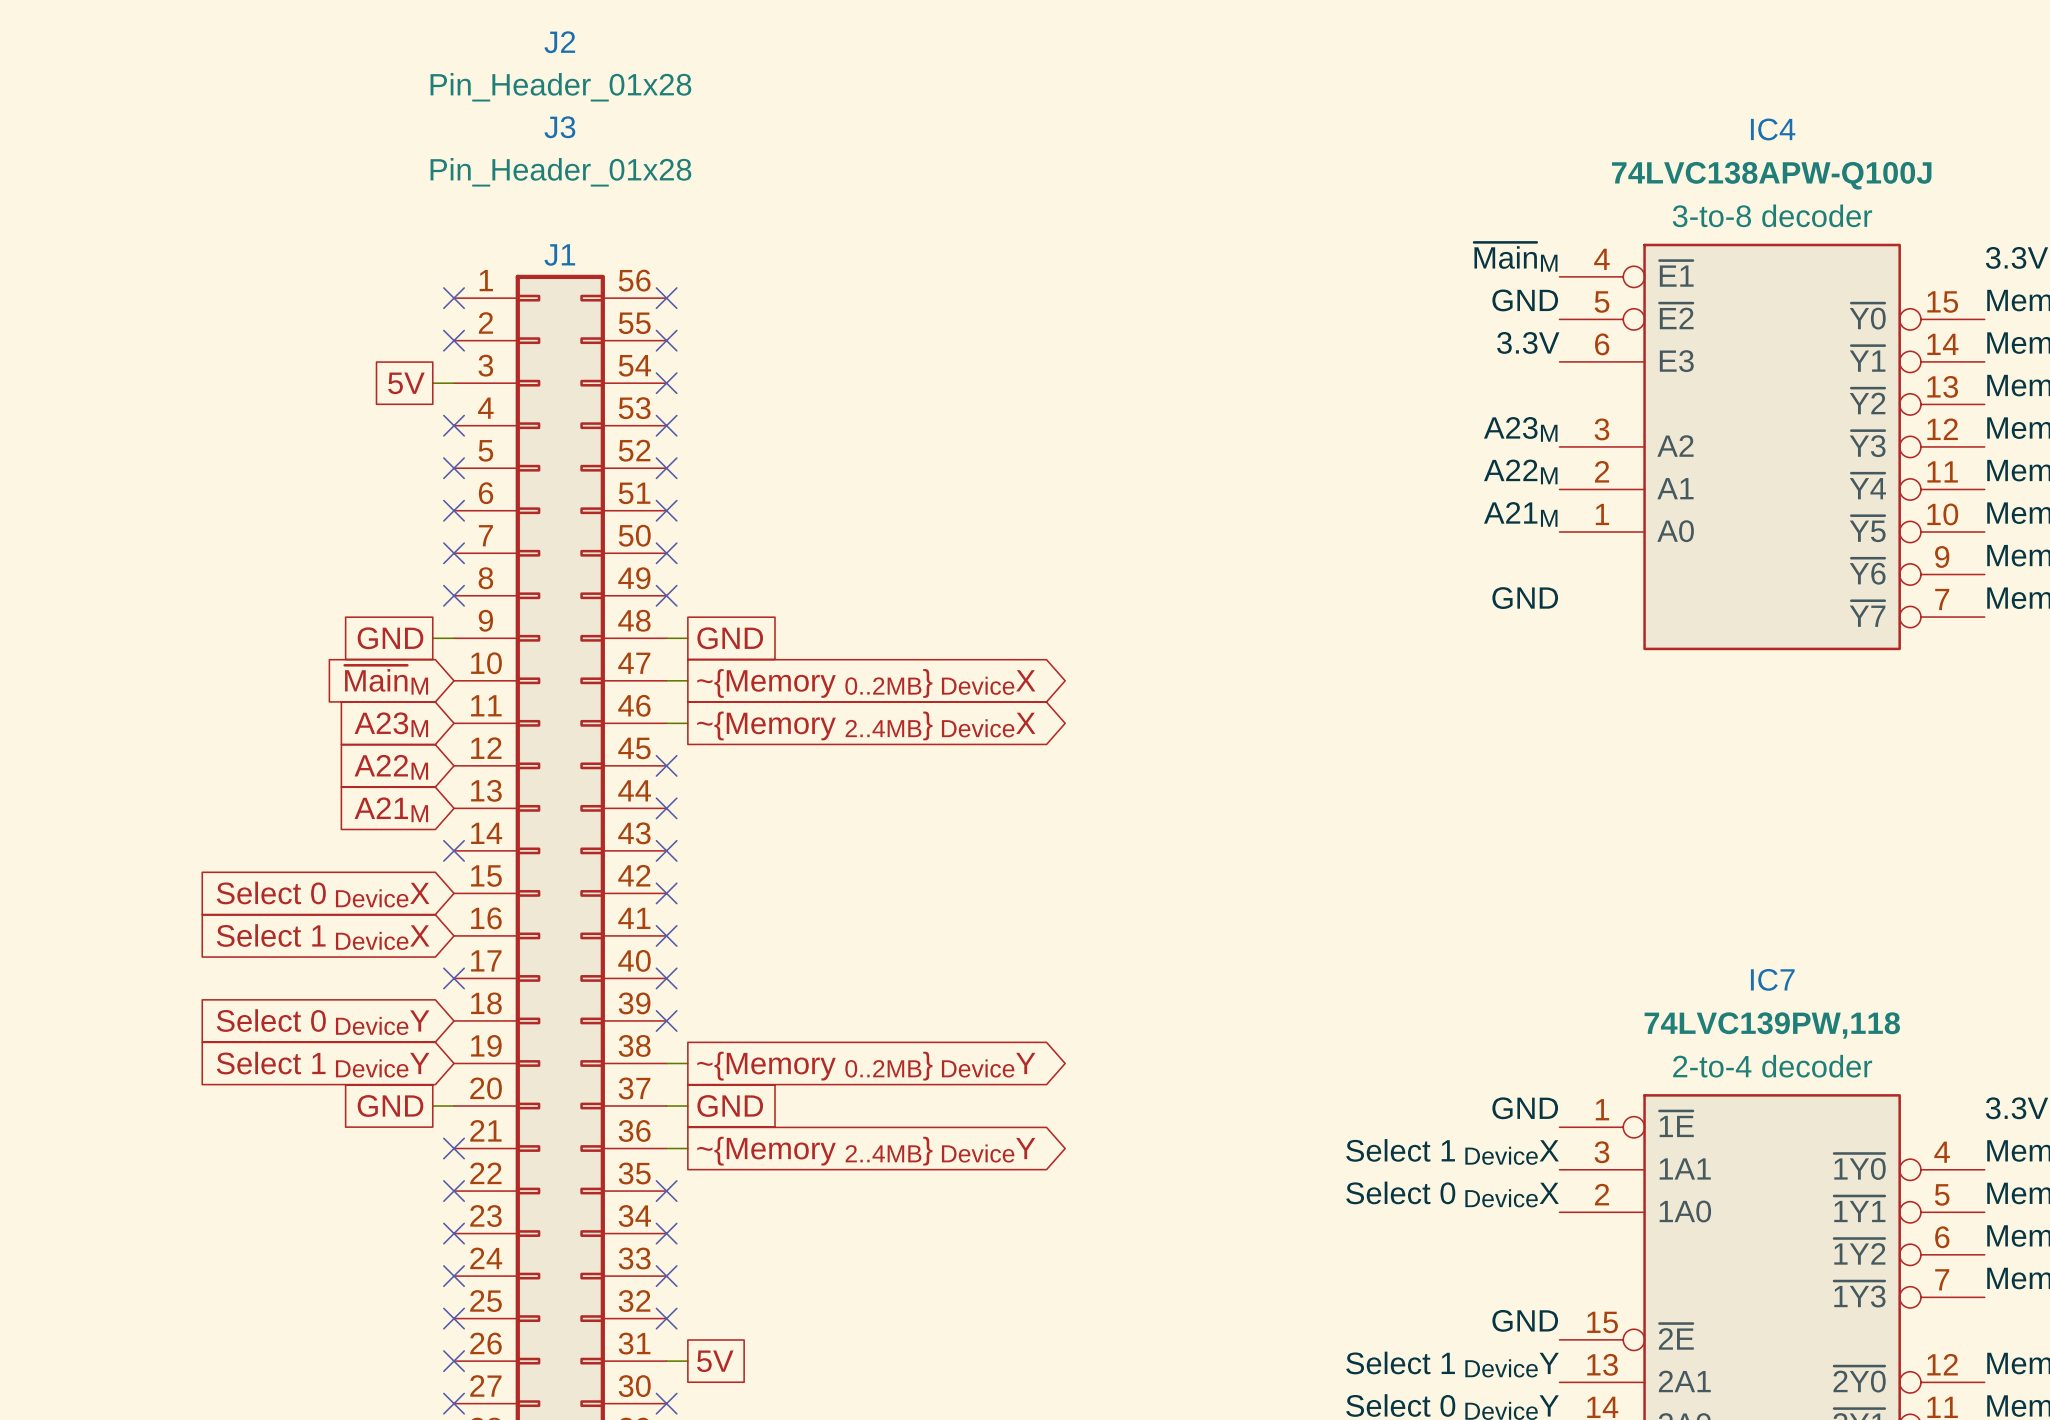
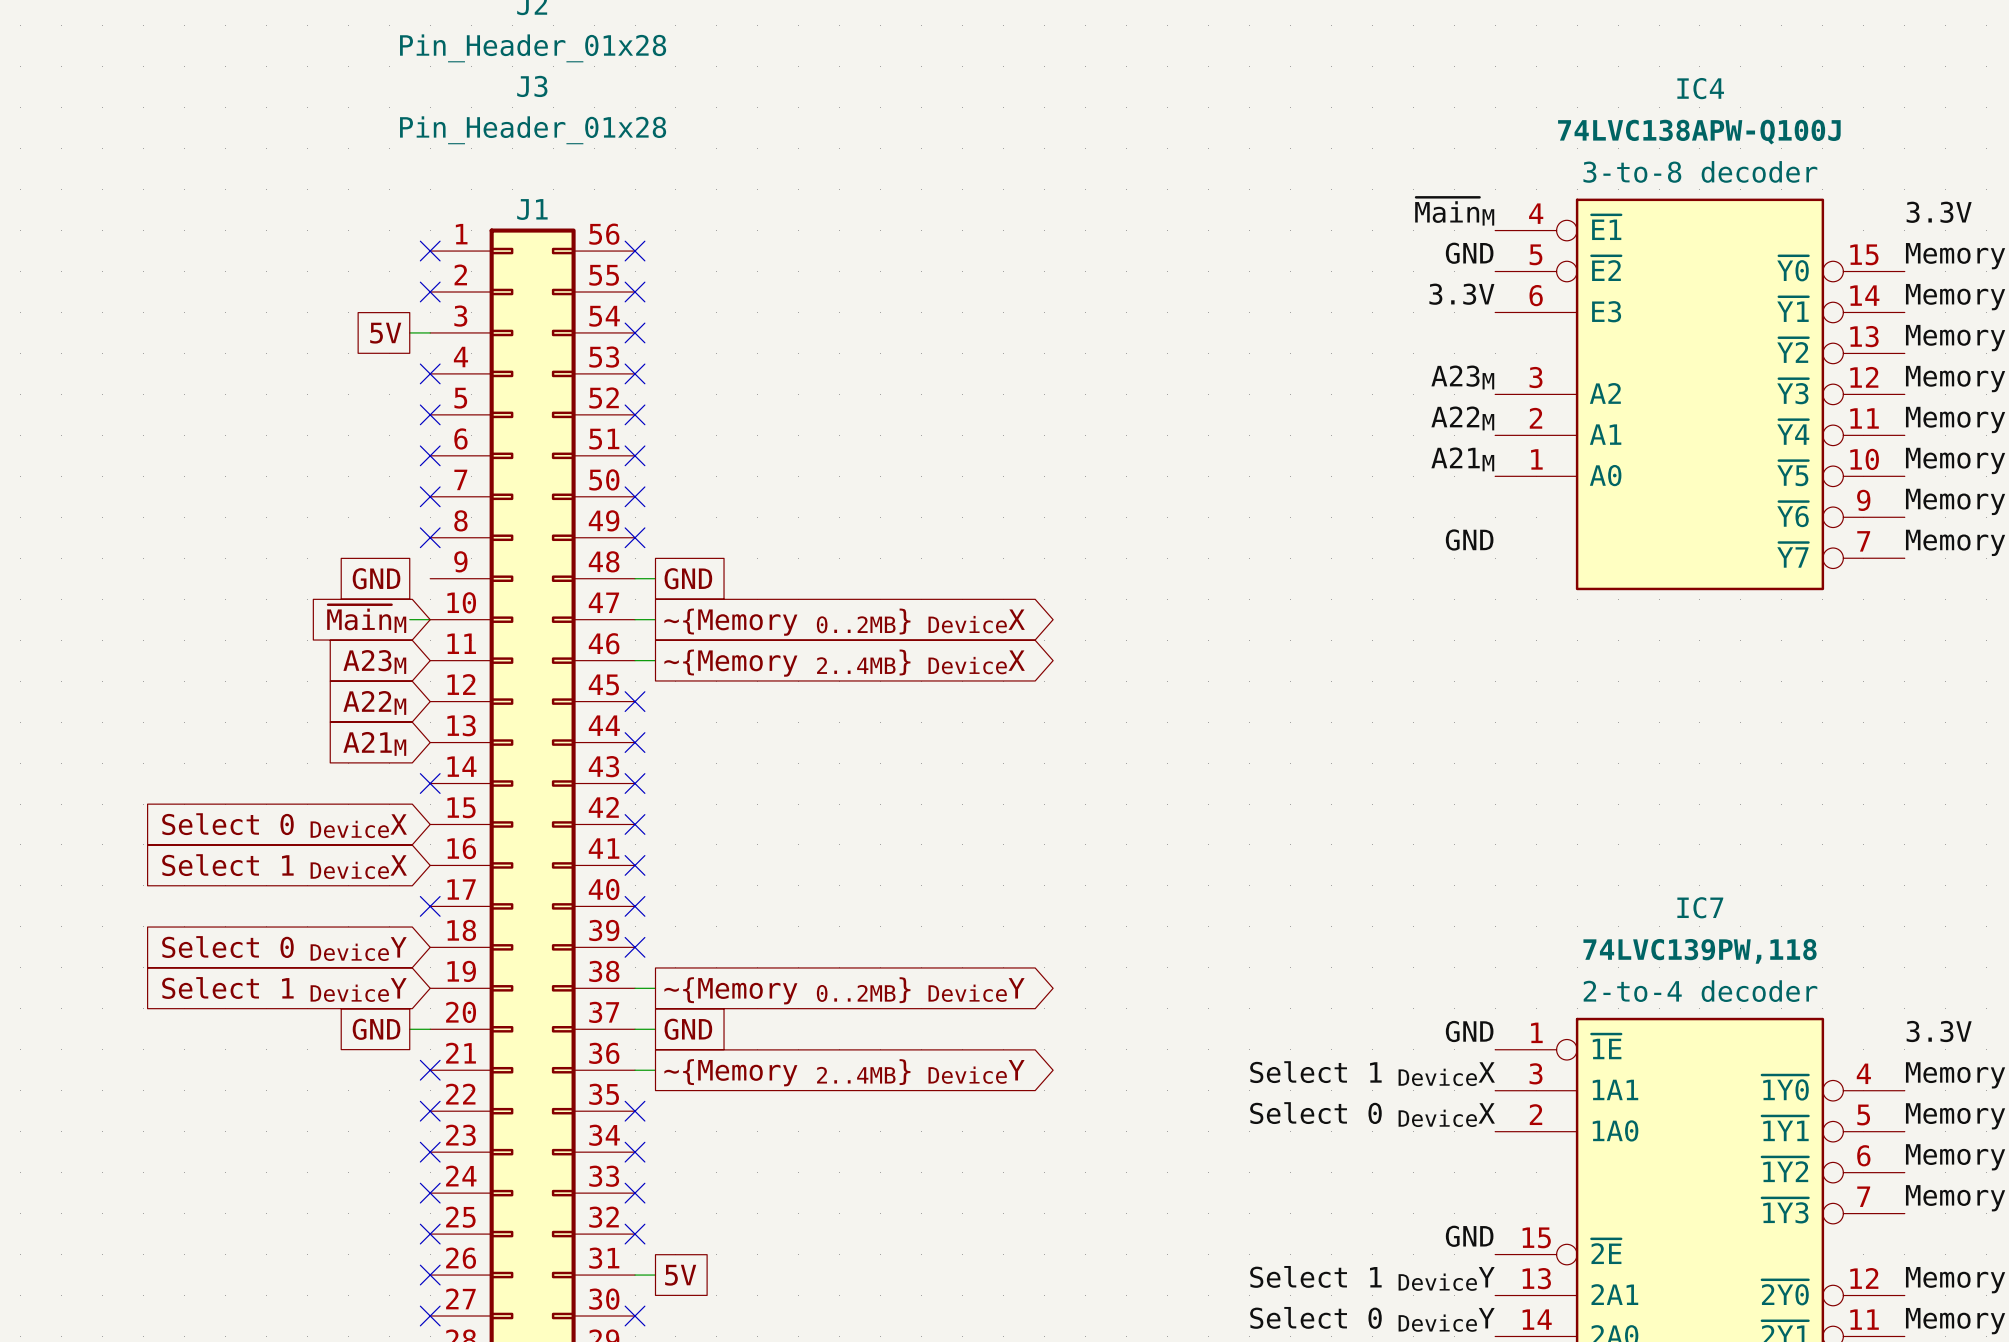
wire: (432, 638) (454, 638) -> (409, 619) (430, 619)

